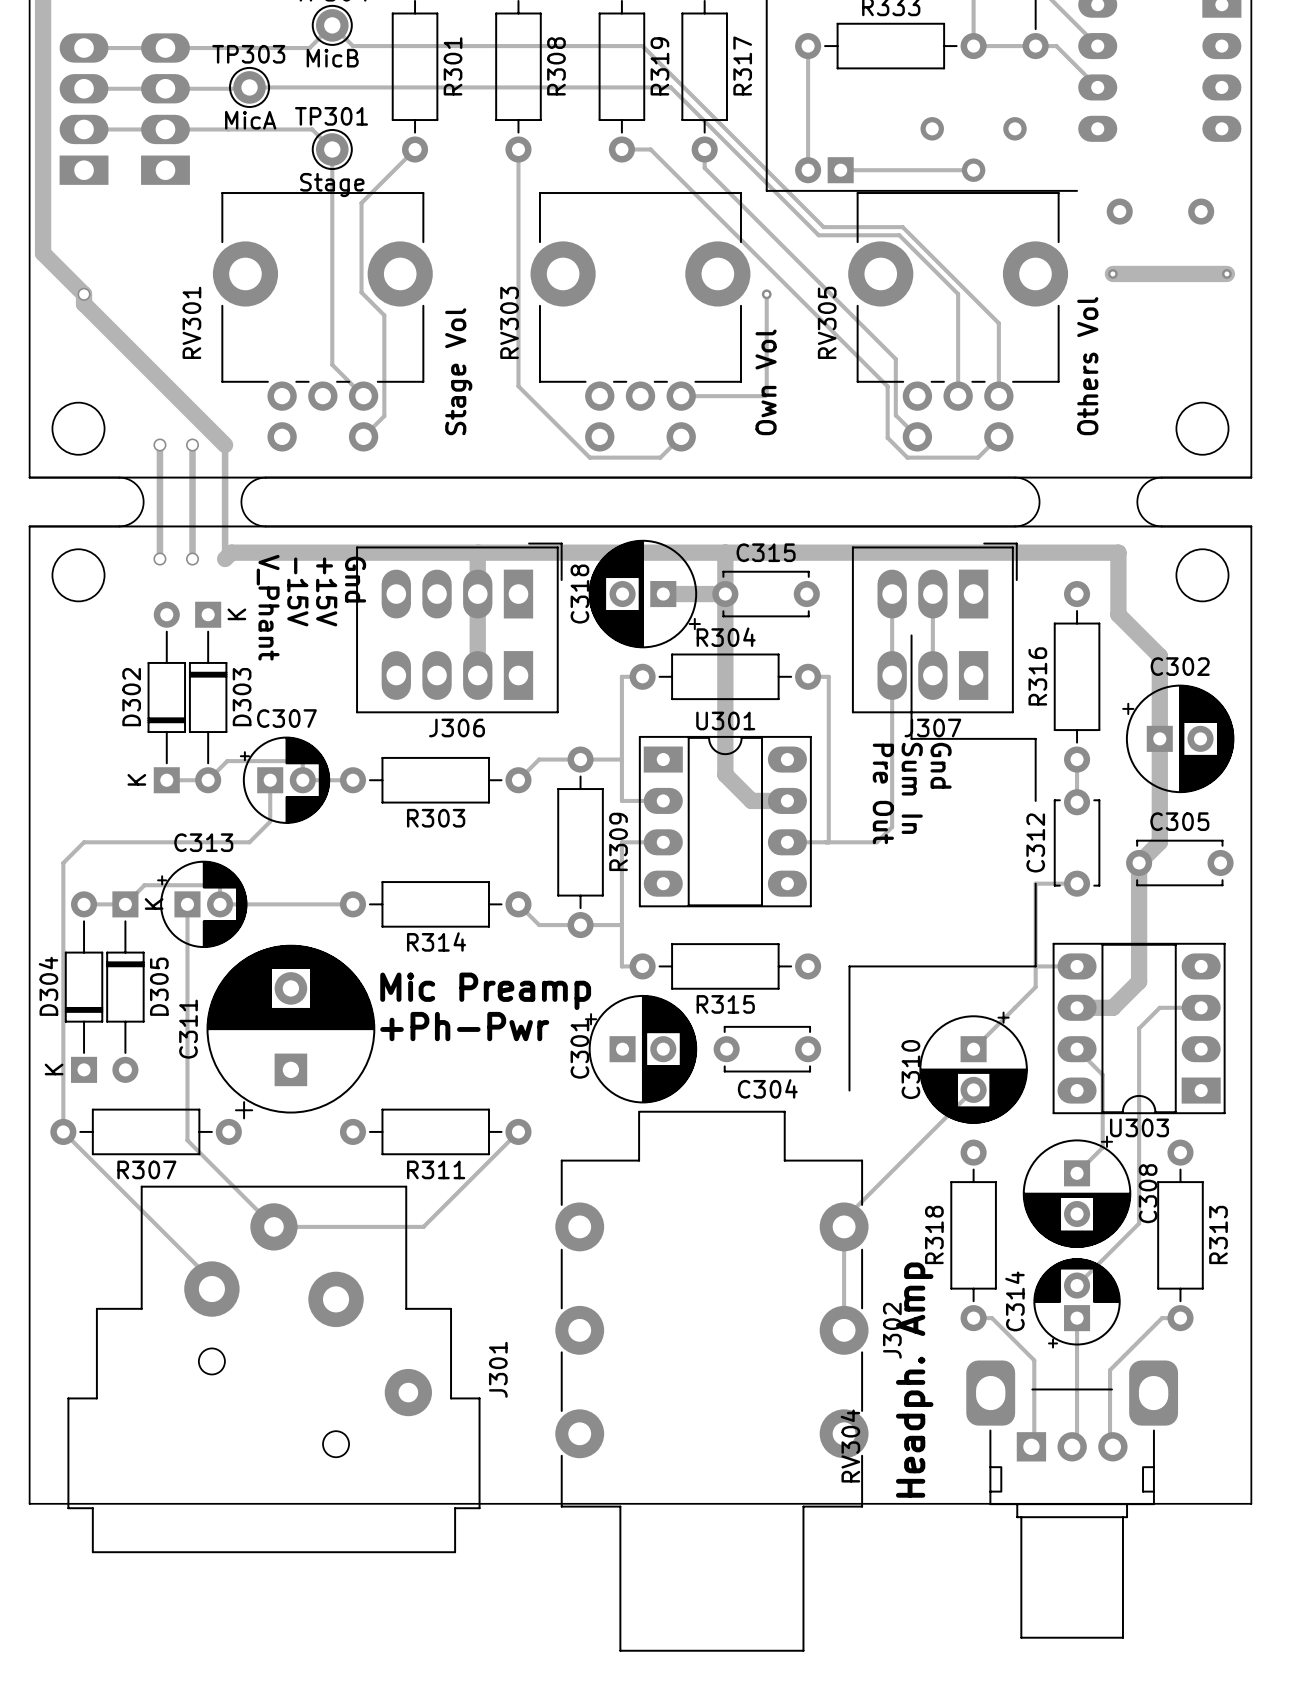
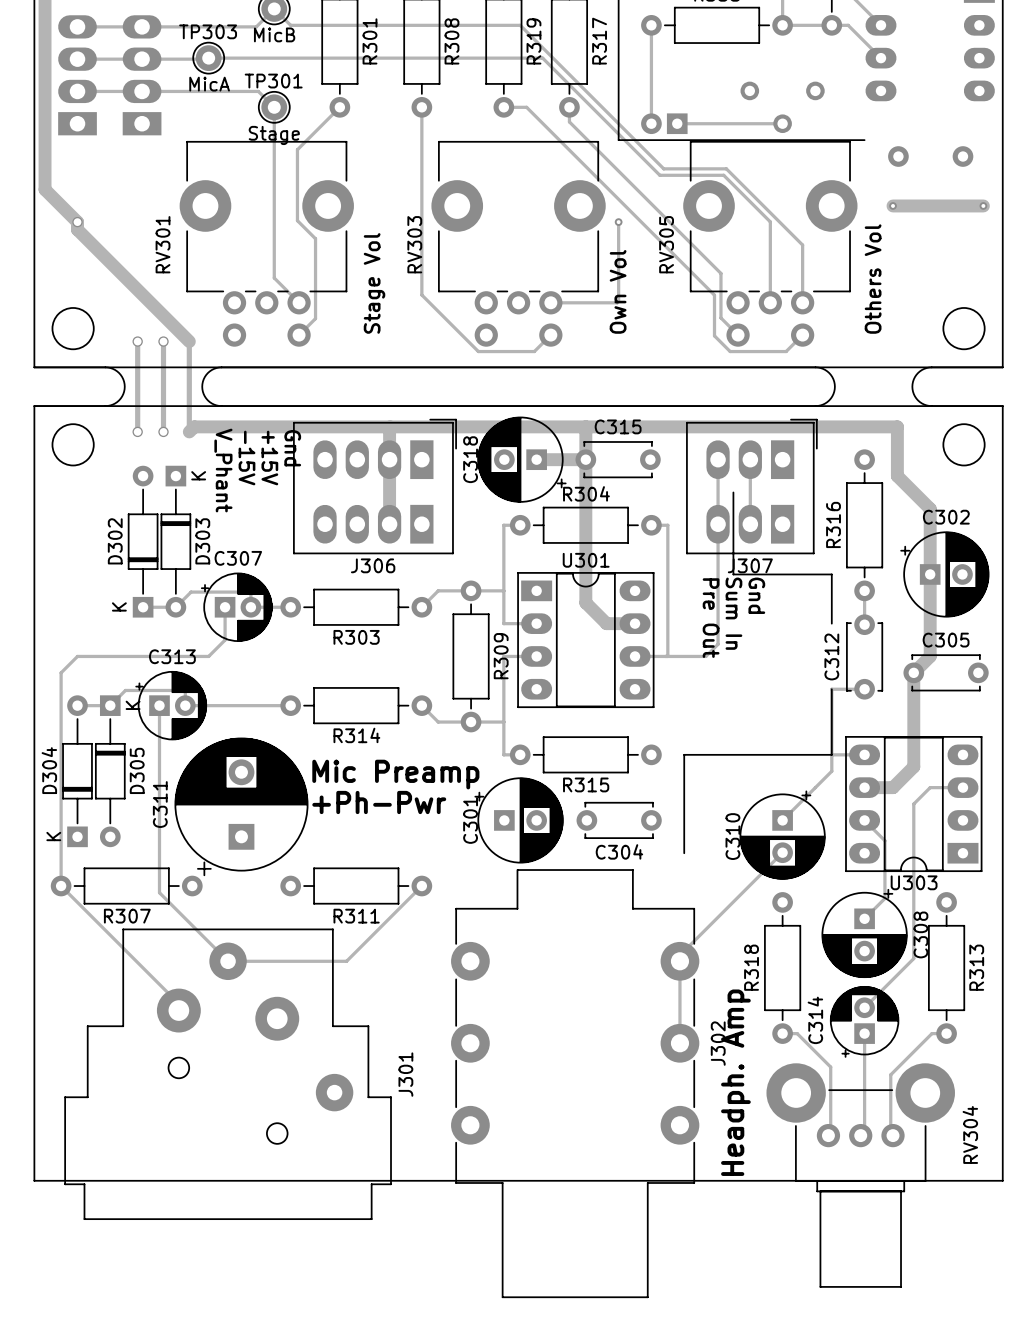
RV304 footprint: [966, 1360, 1179, 1639] -> [766, 1063, 955, 1288]
RV304 name position: RV304 (850, 1446) -> RV304 (970, 1134)

